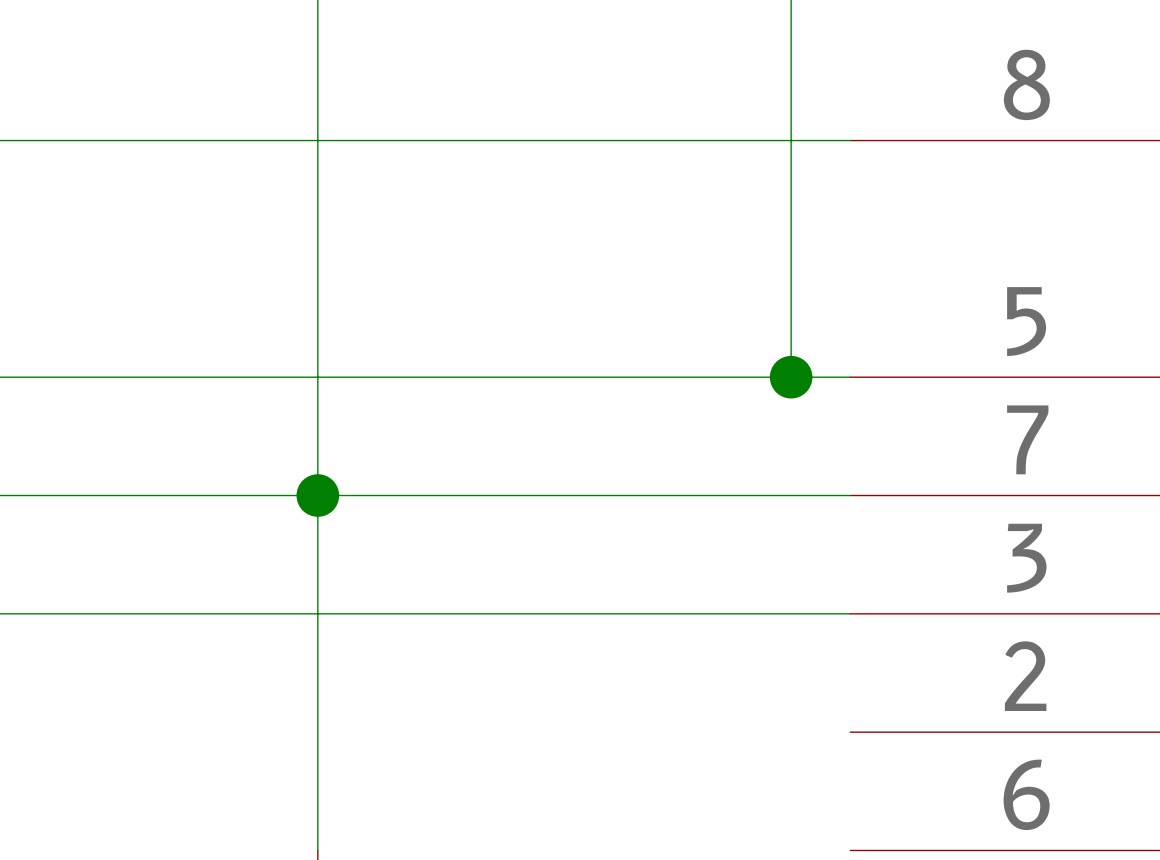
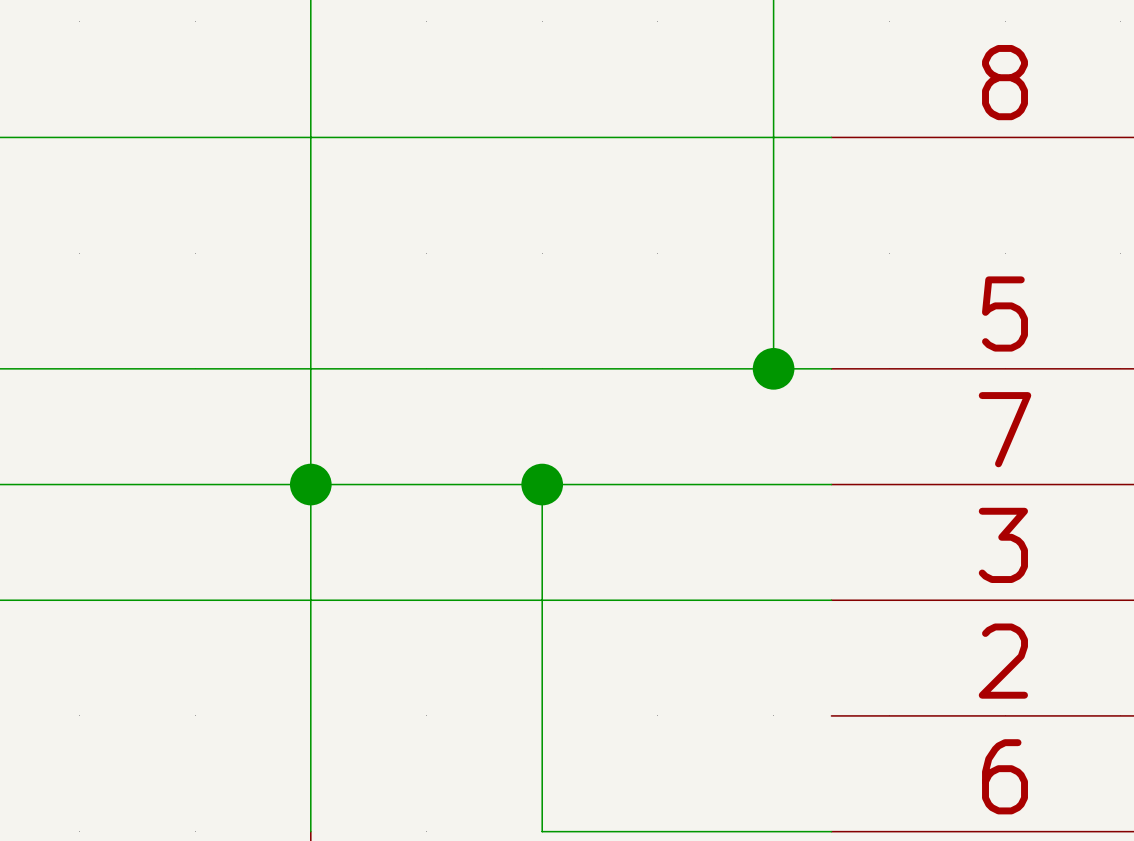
wire: none -> (542, 484) (542, 831) (831, 831)
junction: none -> (542, 484)

